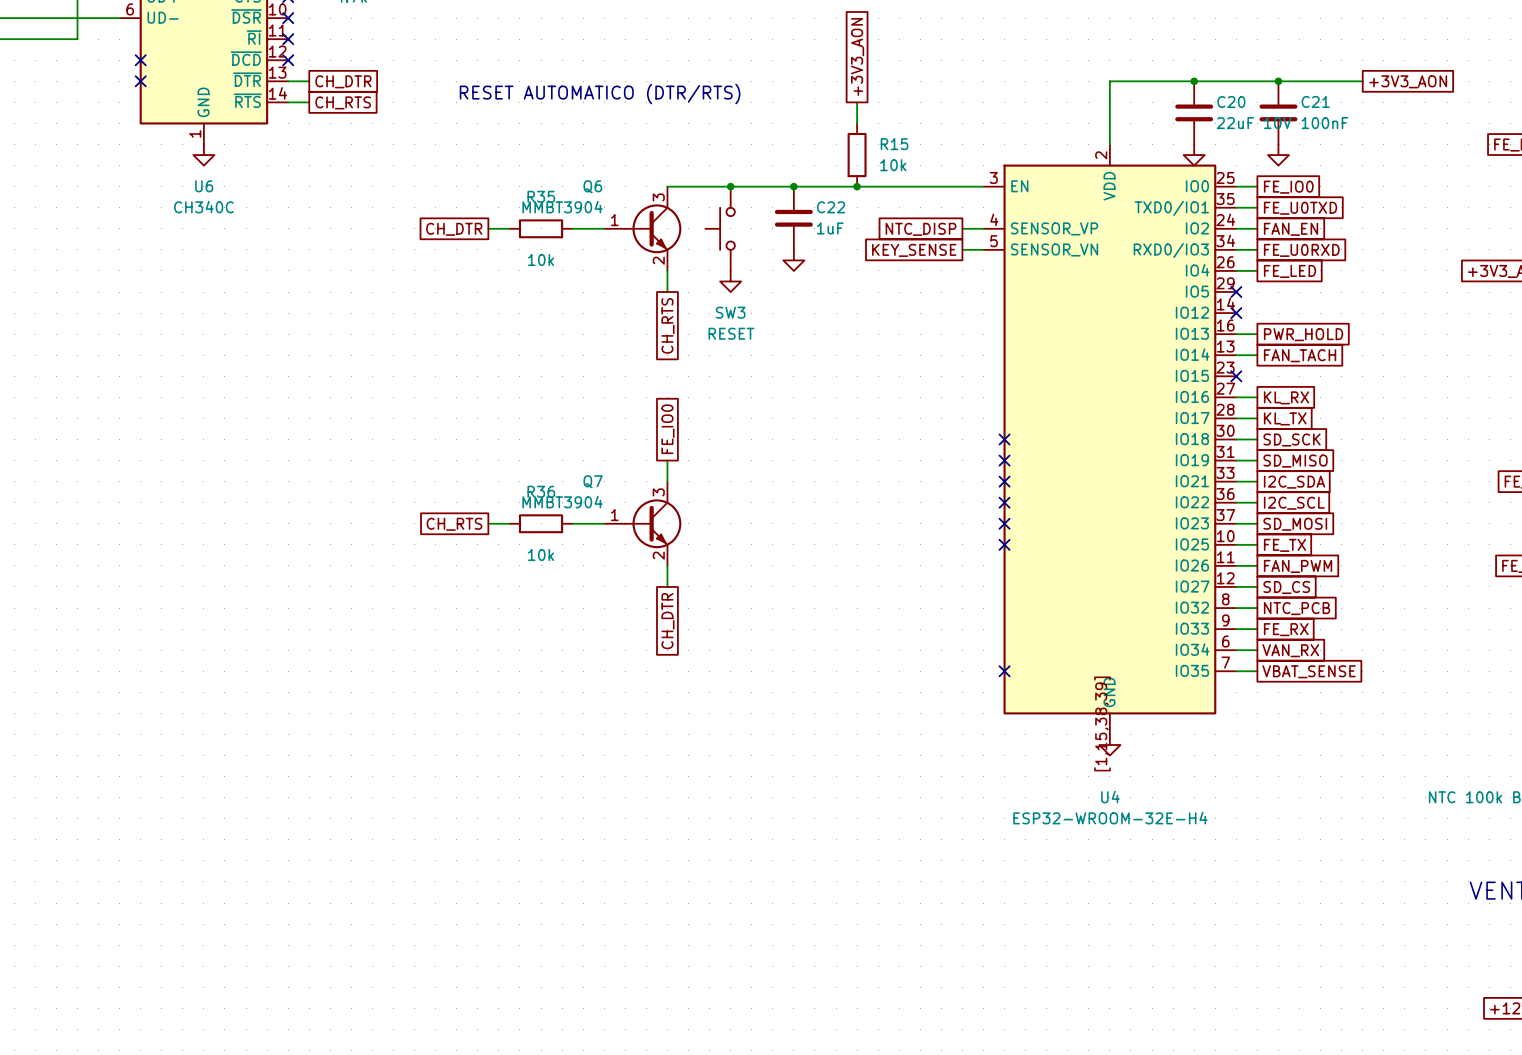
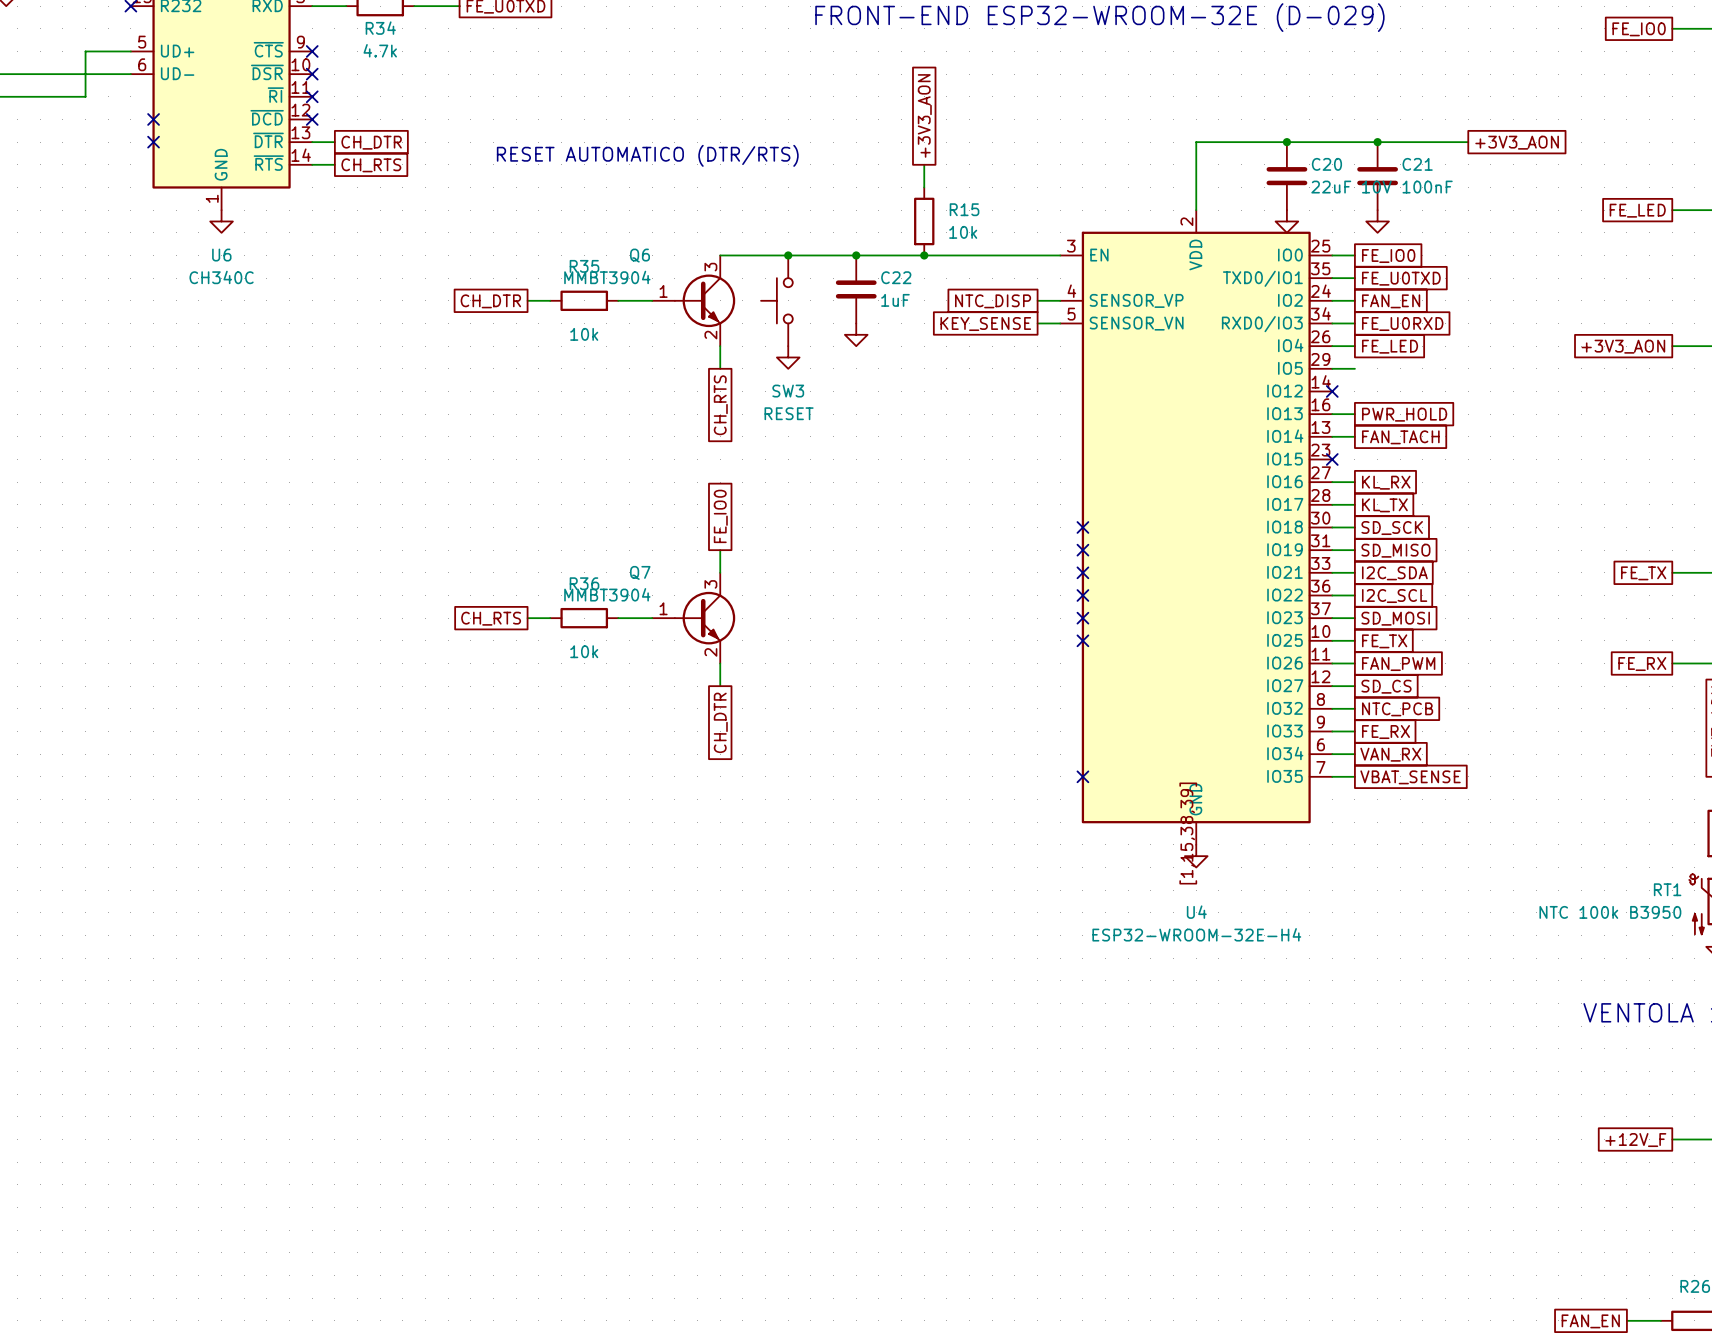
wire: none -> (1332, 368) (1354, 368)
no-connect mark: (1236, 292) -> none

